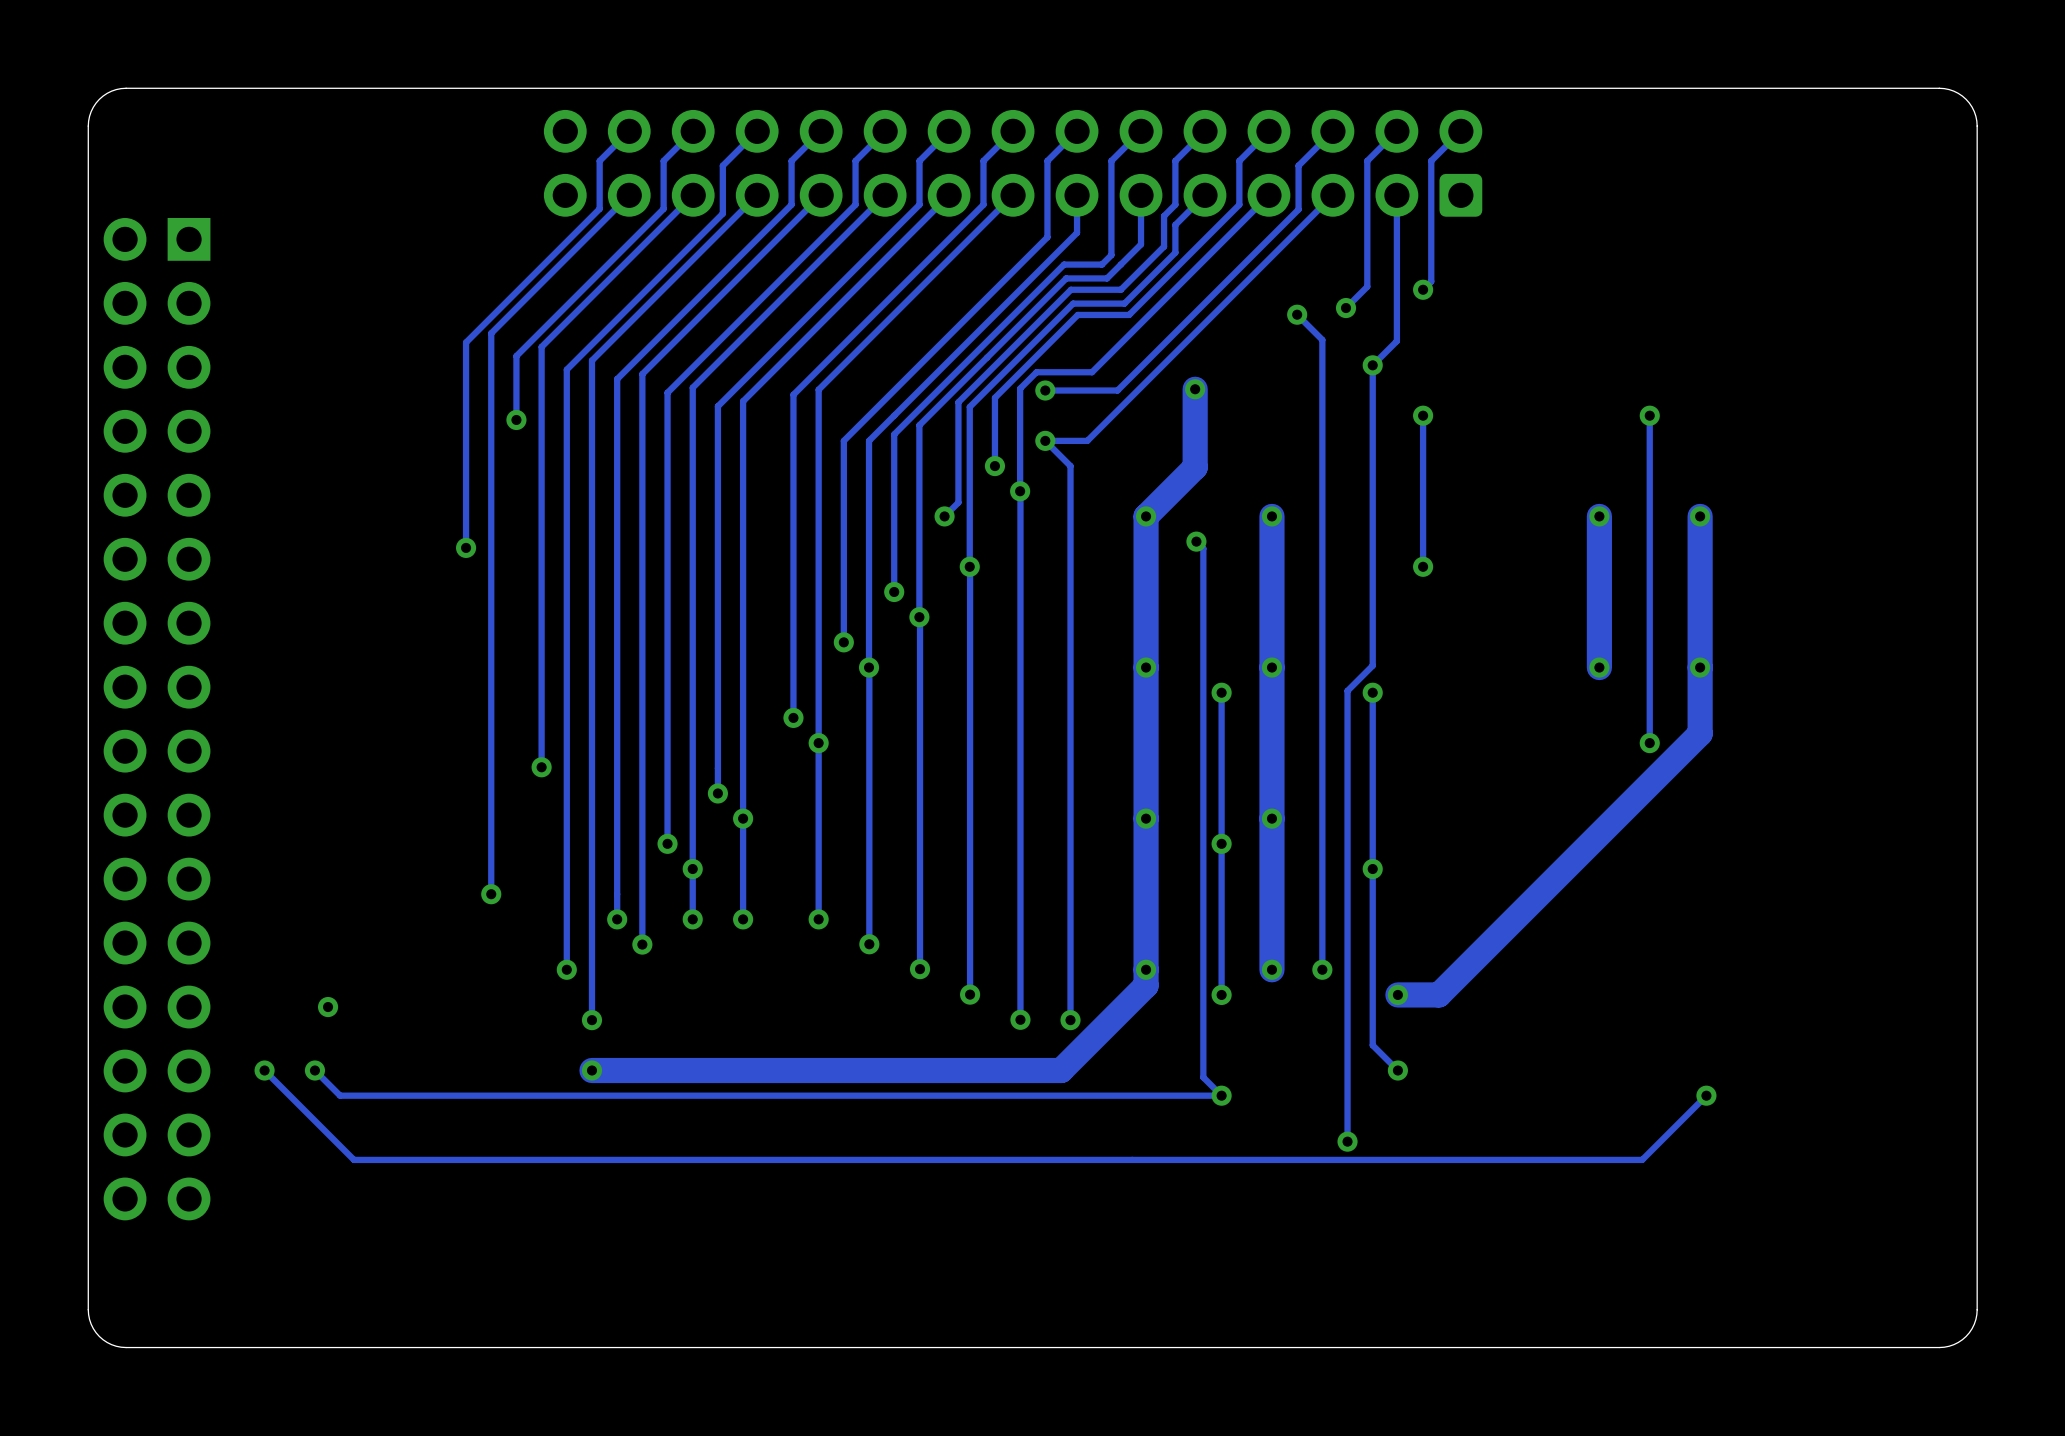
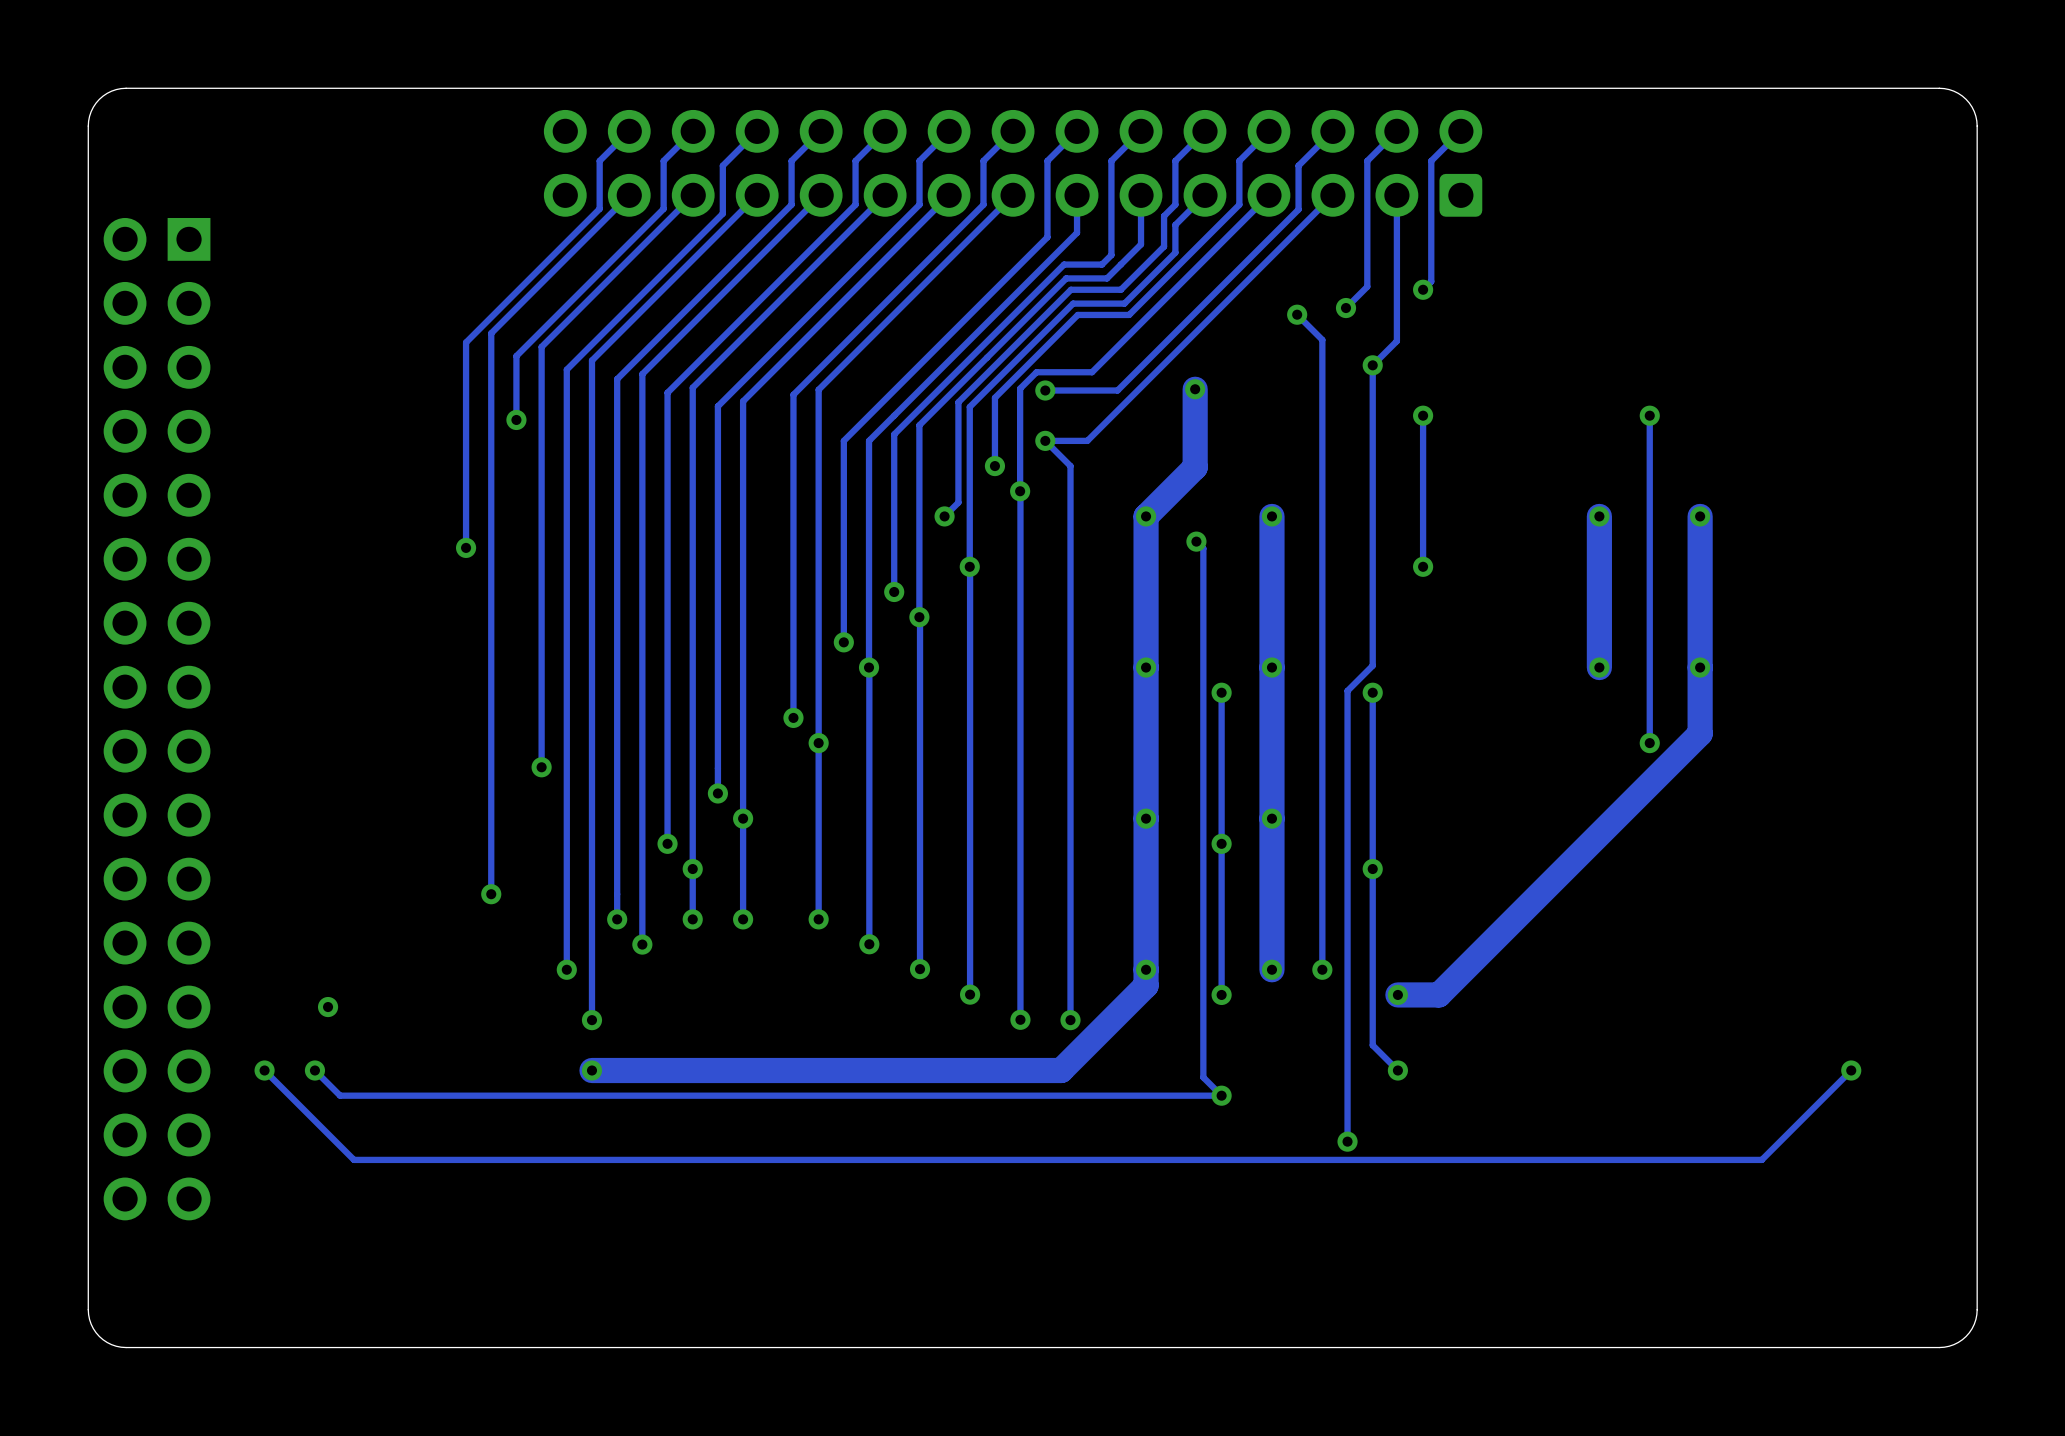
track: (1706, 1095) (1642, 1159) -> (1851, 1070) (1761, 1159) (1642, 1159)
via position: (1706, 1095) -> (1851, 1070)

